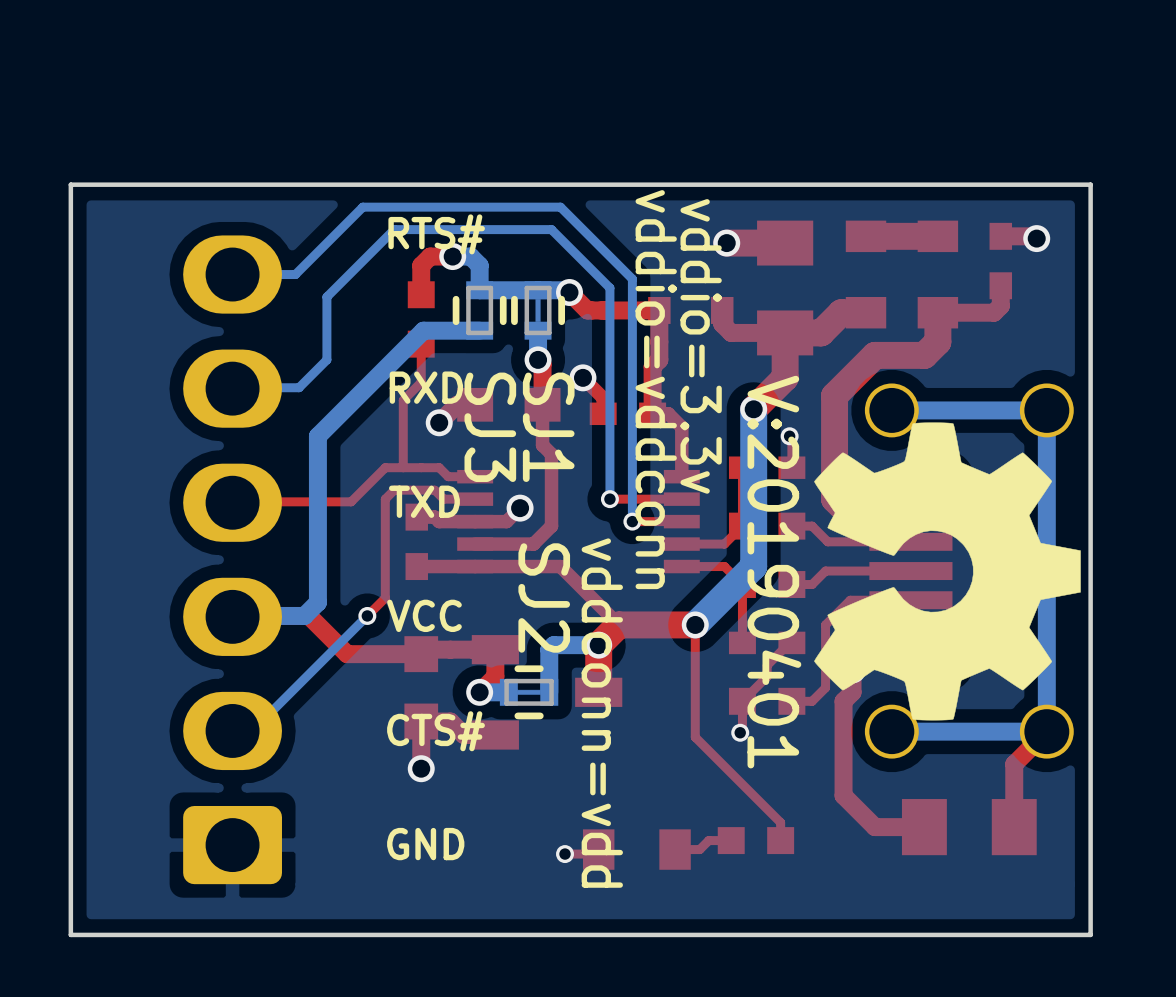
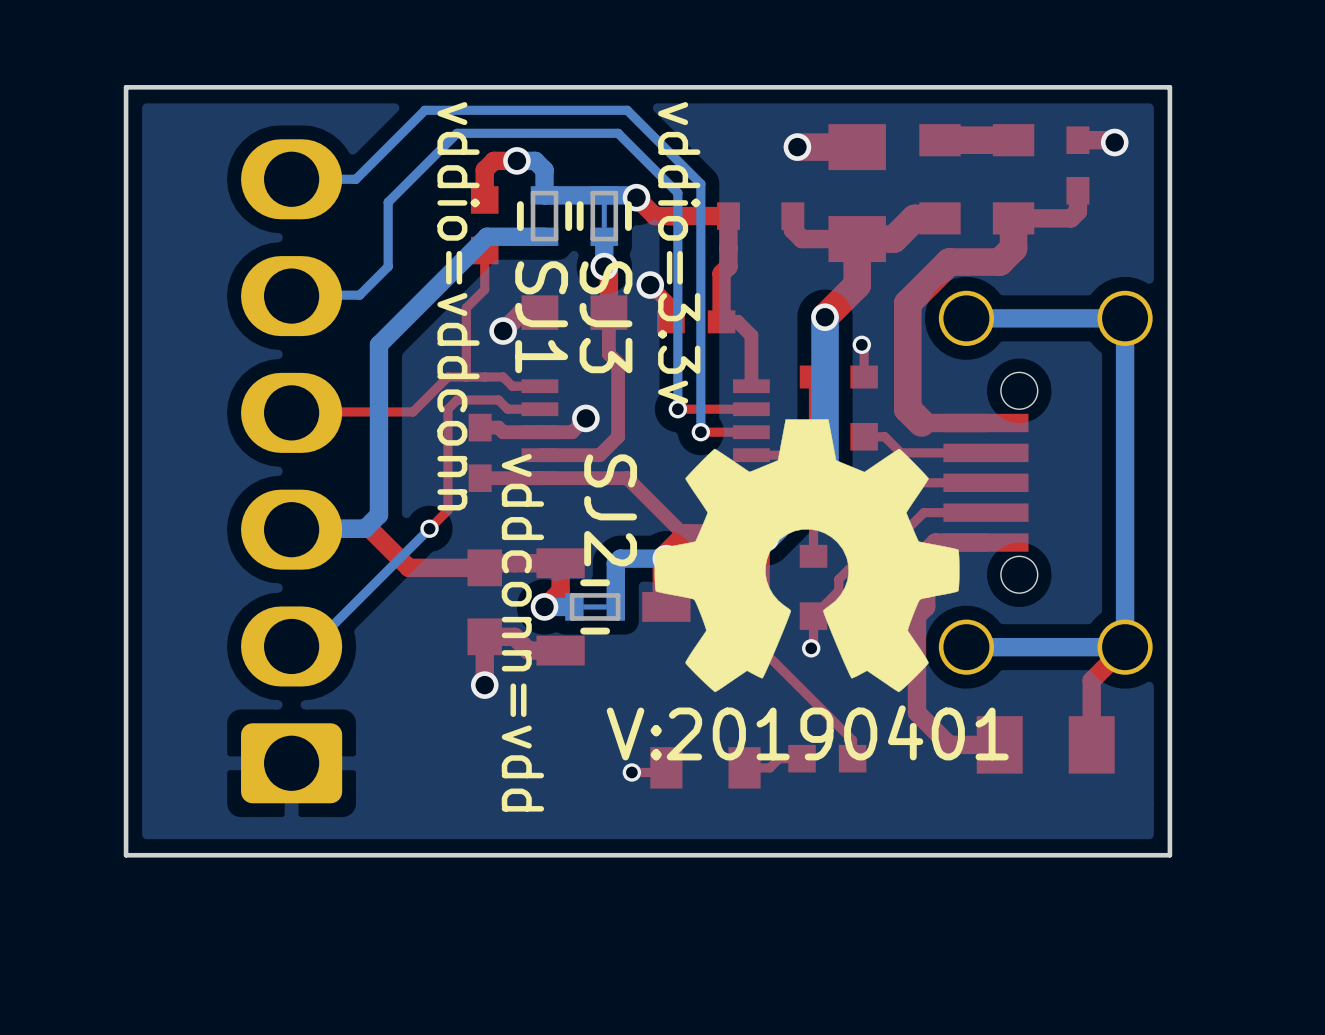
part text: RTS# (436, 234) -> none
SJ3 value position: vddio=3.3v (701, 346) -> vddio=3.3v (679, 252)
part text: RXD (426, 387) -> none
SJ1 value position: vddio=vddconn (656, 389) -> vddio=vddconn (458, 306)
drawing: [814, 422, 1081, 721] -> none
SJ3 name position: SJ3 (490, 427) -> SJ3 (606, 317)
SJ1 name position: SJ1 (548, 427) -> SJ1 (541, 317)
part text: TXD (424, 501) -> none
drawing: none -> [654, 419, 960, 693]
part text: VCC (424, 615) -> none
SJ2 value position: vddconn=vdd (602, 713) -> vddconn=vdd (522, 632)
part text: CTS# (436, 731) -> none
part text: GND (425, 844) -> none

